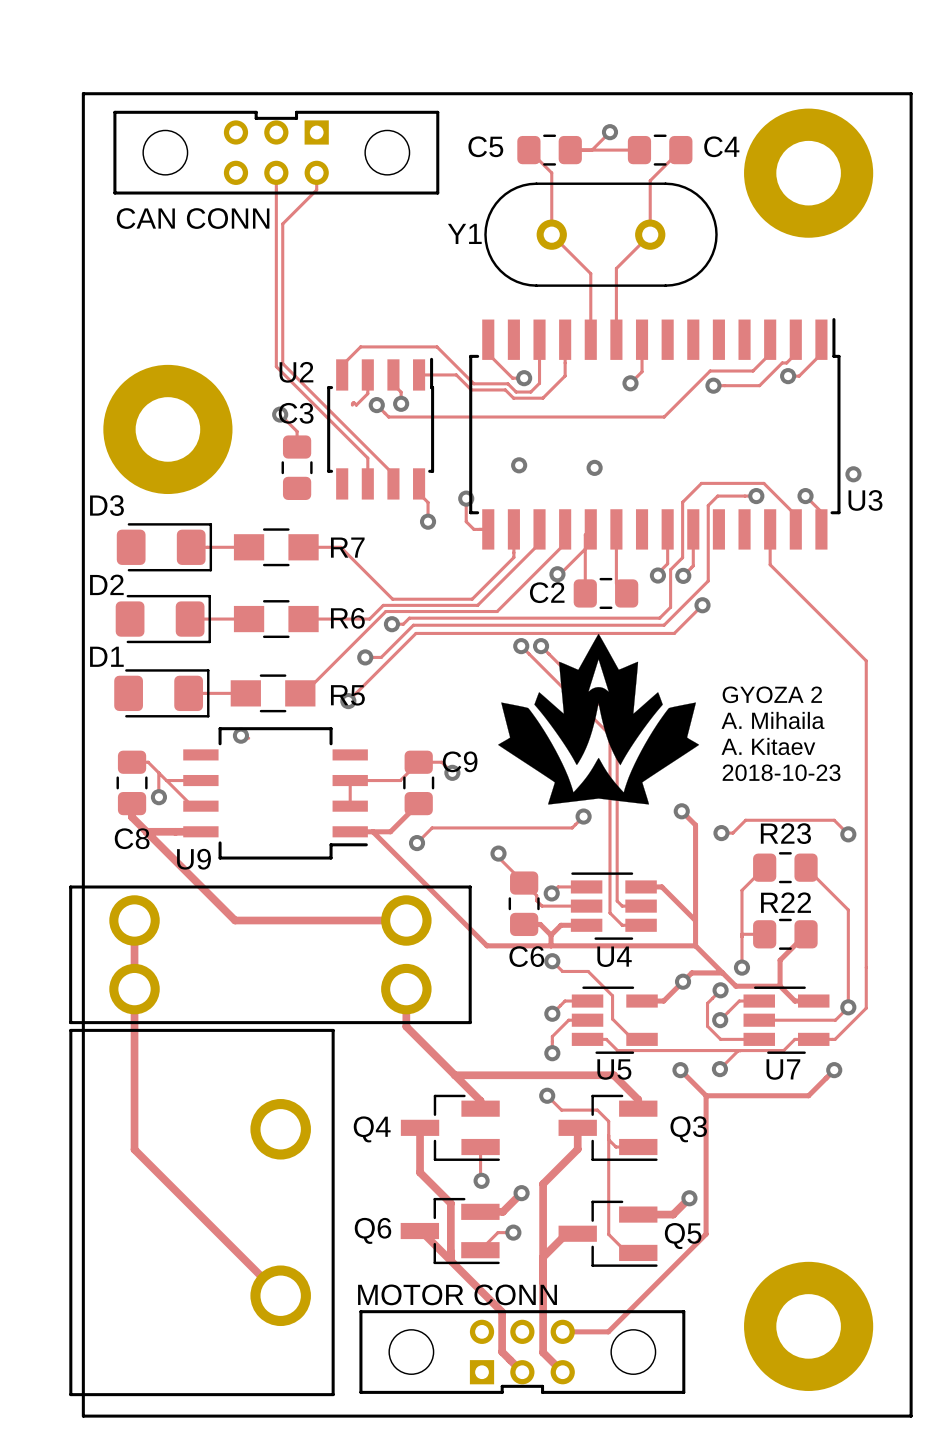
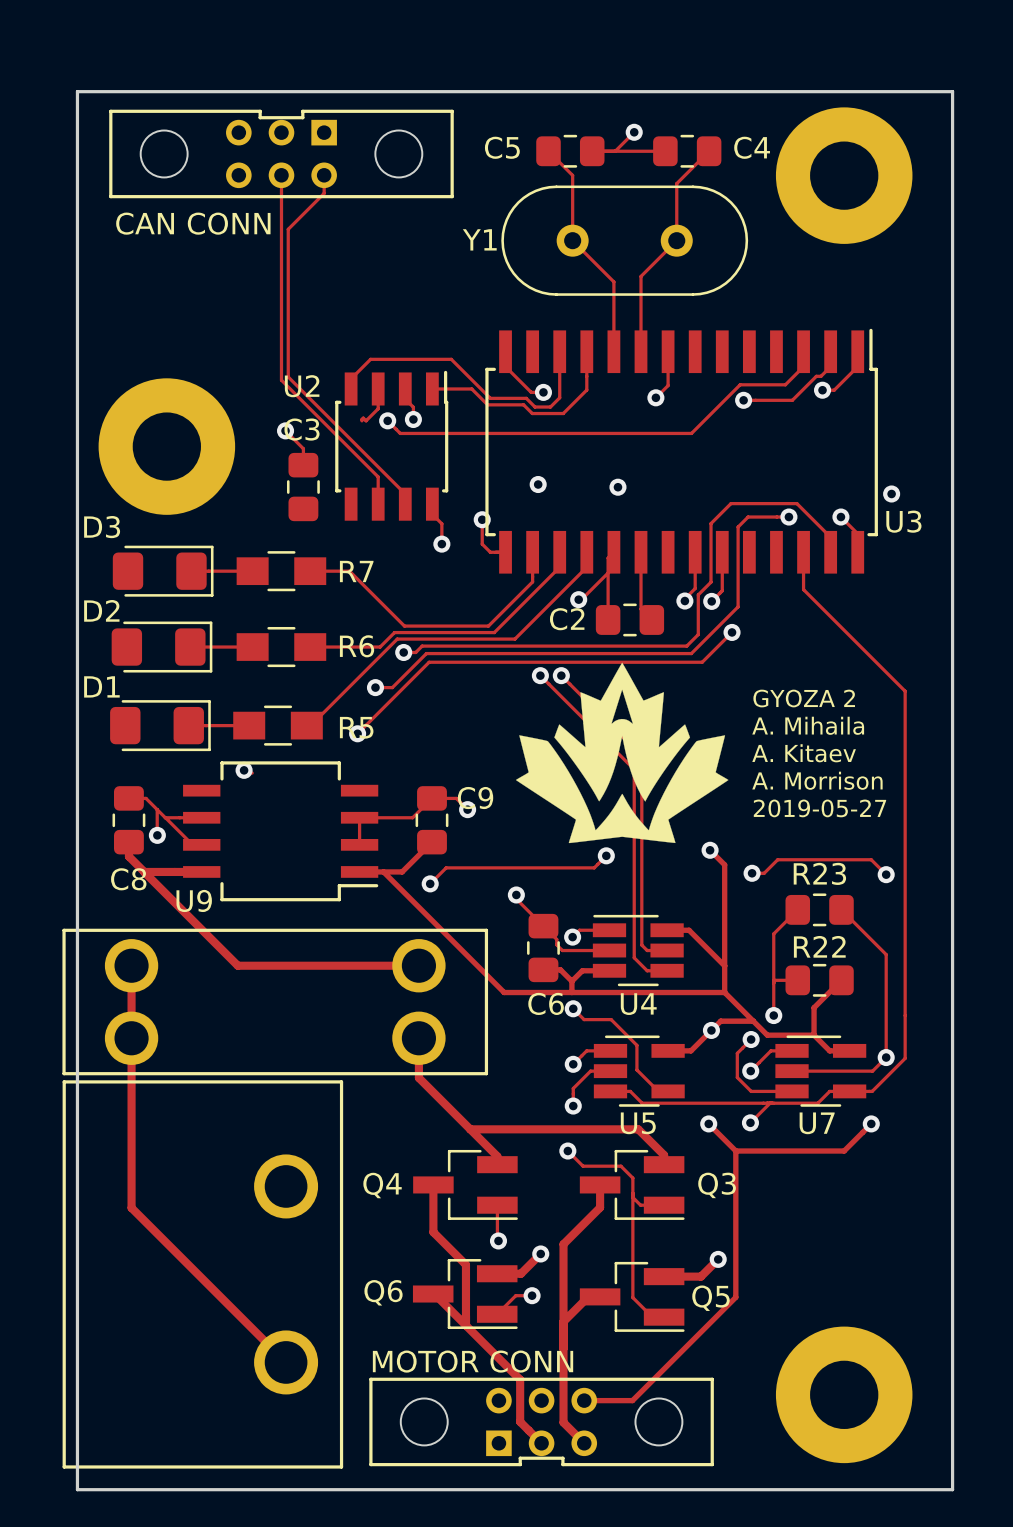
text: none -> GYOZA 2 (804, 698)
text: GYOZA 2 (772, 694) -> A. Mihaila (808, 725)
text: A. Mihaila (773, 720) -> A. Kitaev (804, 753)
text: A. Kitaev (768, 746) -> A. Morrison (817, 780)
text: 2018-10-23 (781, 772) -> 2019-05-27 (819, 808)

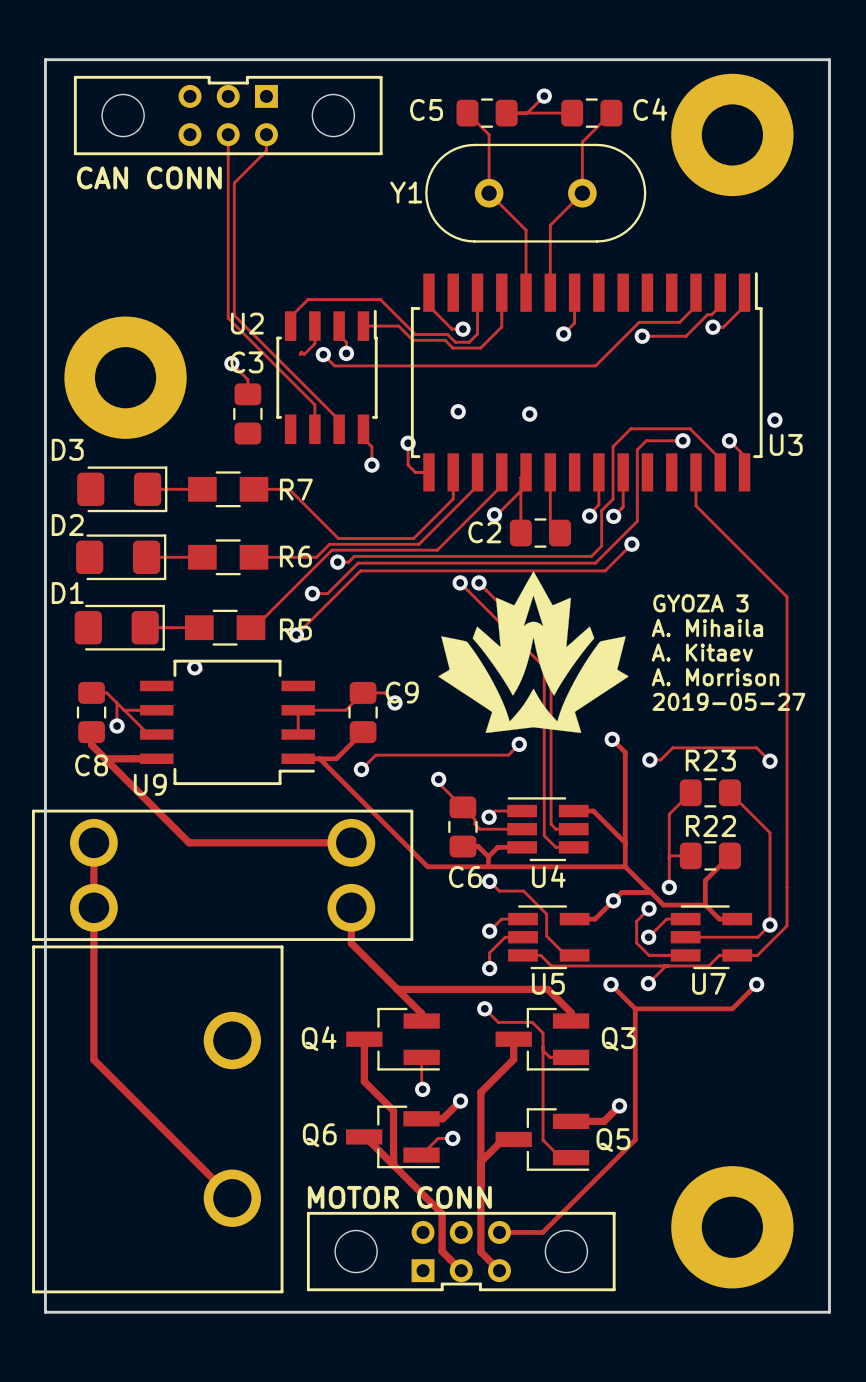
text: GYOZA 2 (804, 698) -> GYOZA 3 (700, 603)

